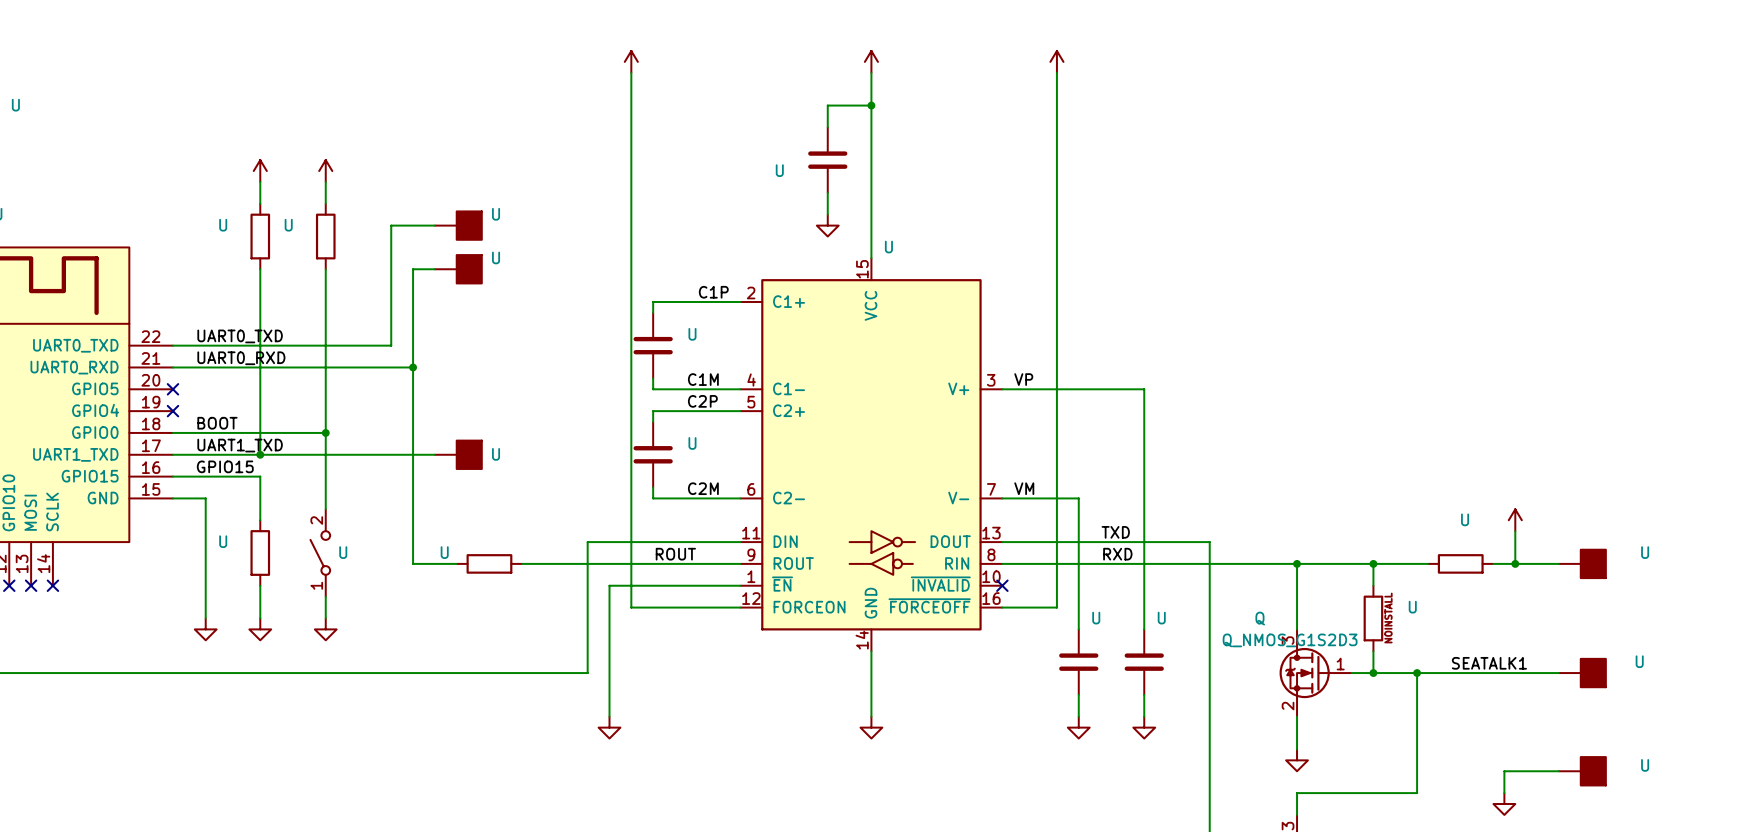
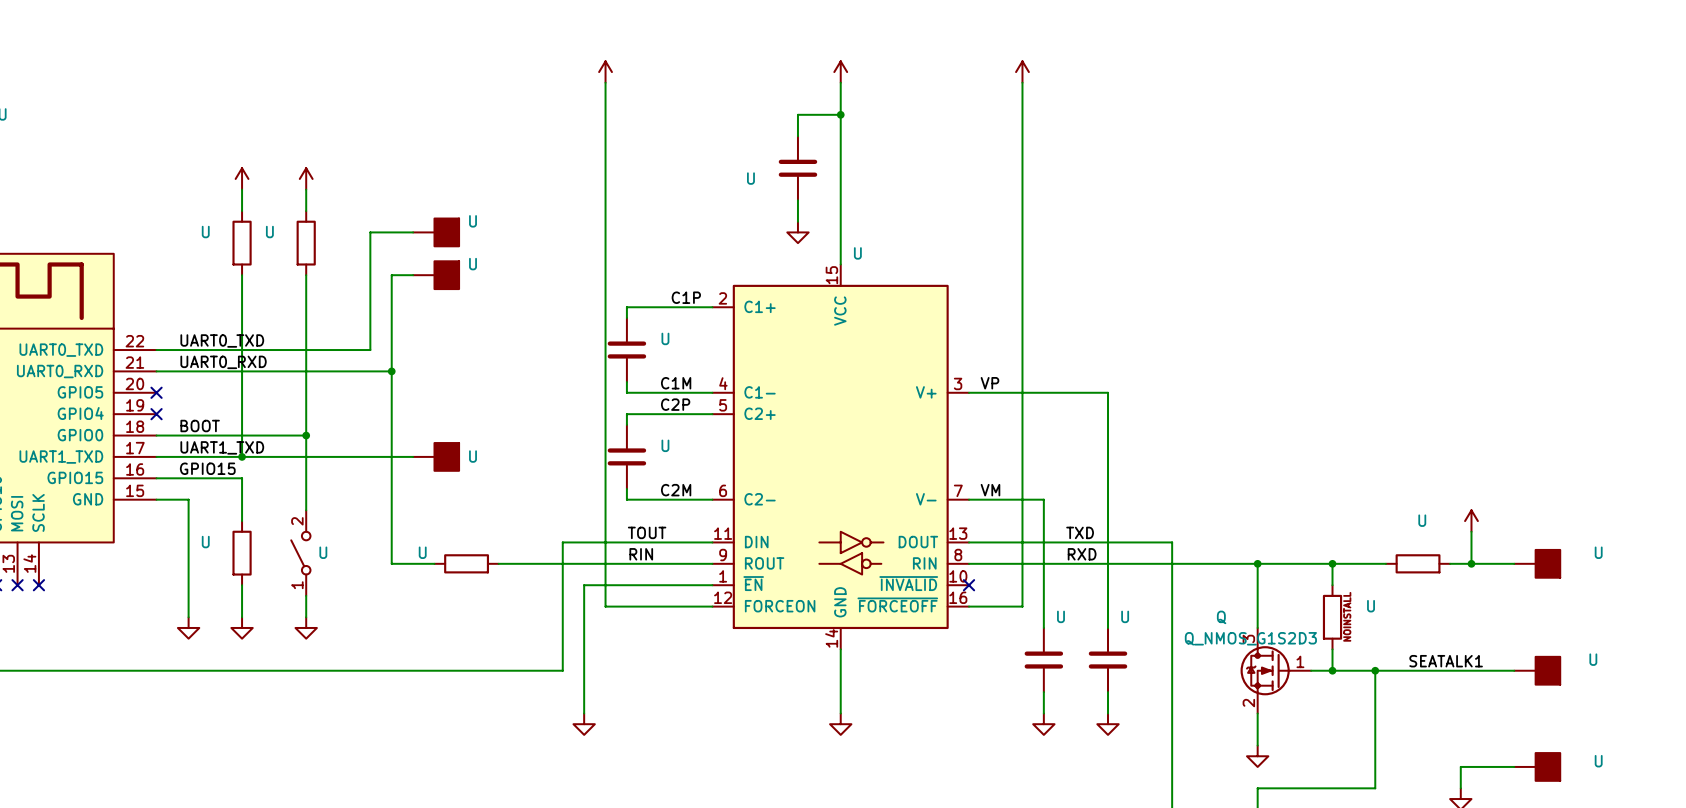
label: none -> TOUT (647, 532)
label: ROUT (675, 554) -> RIN (641, 554)

